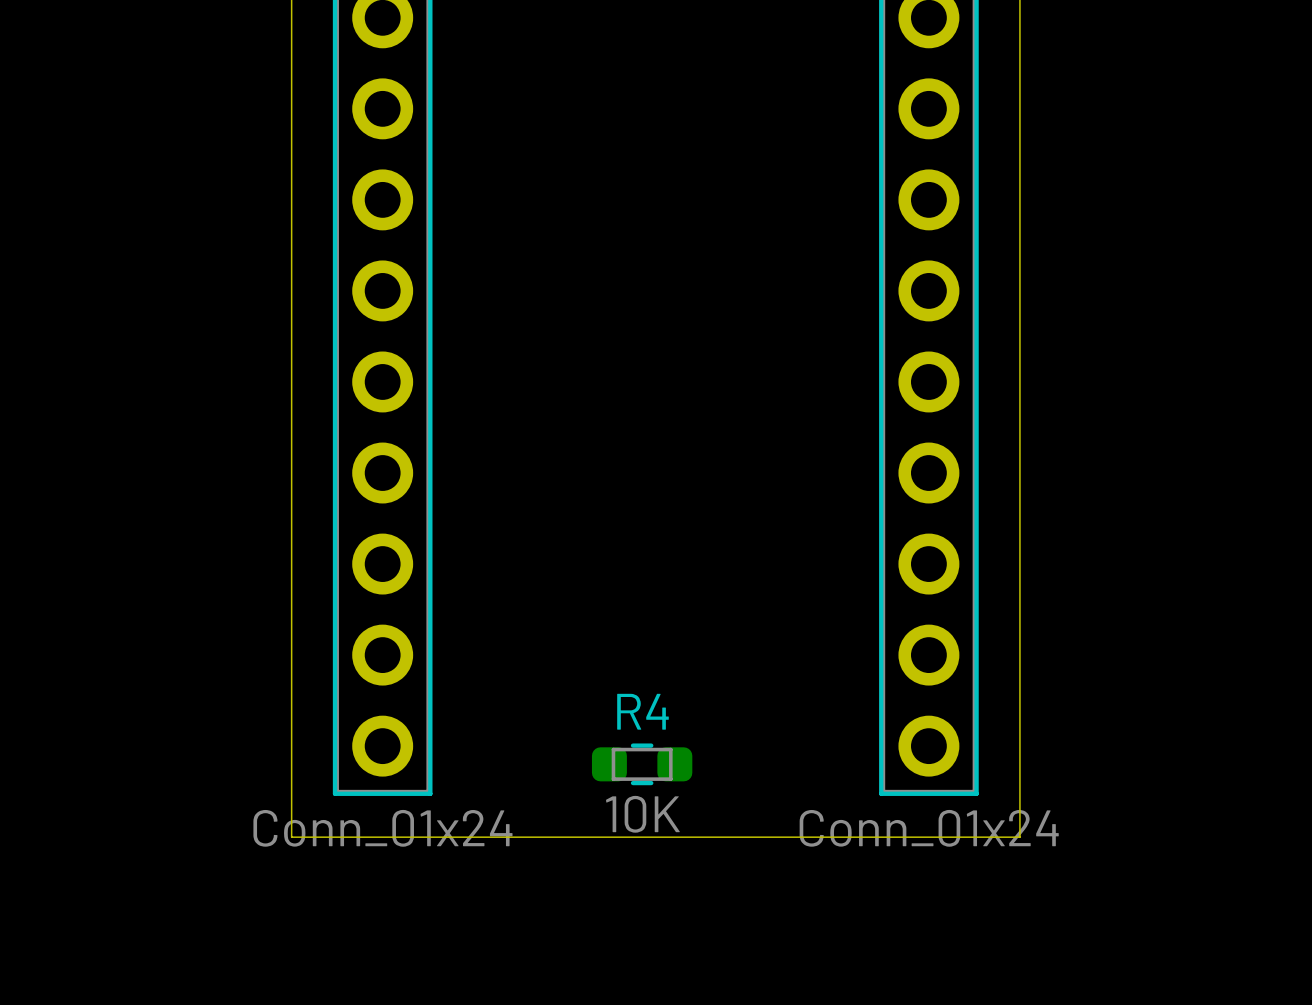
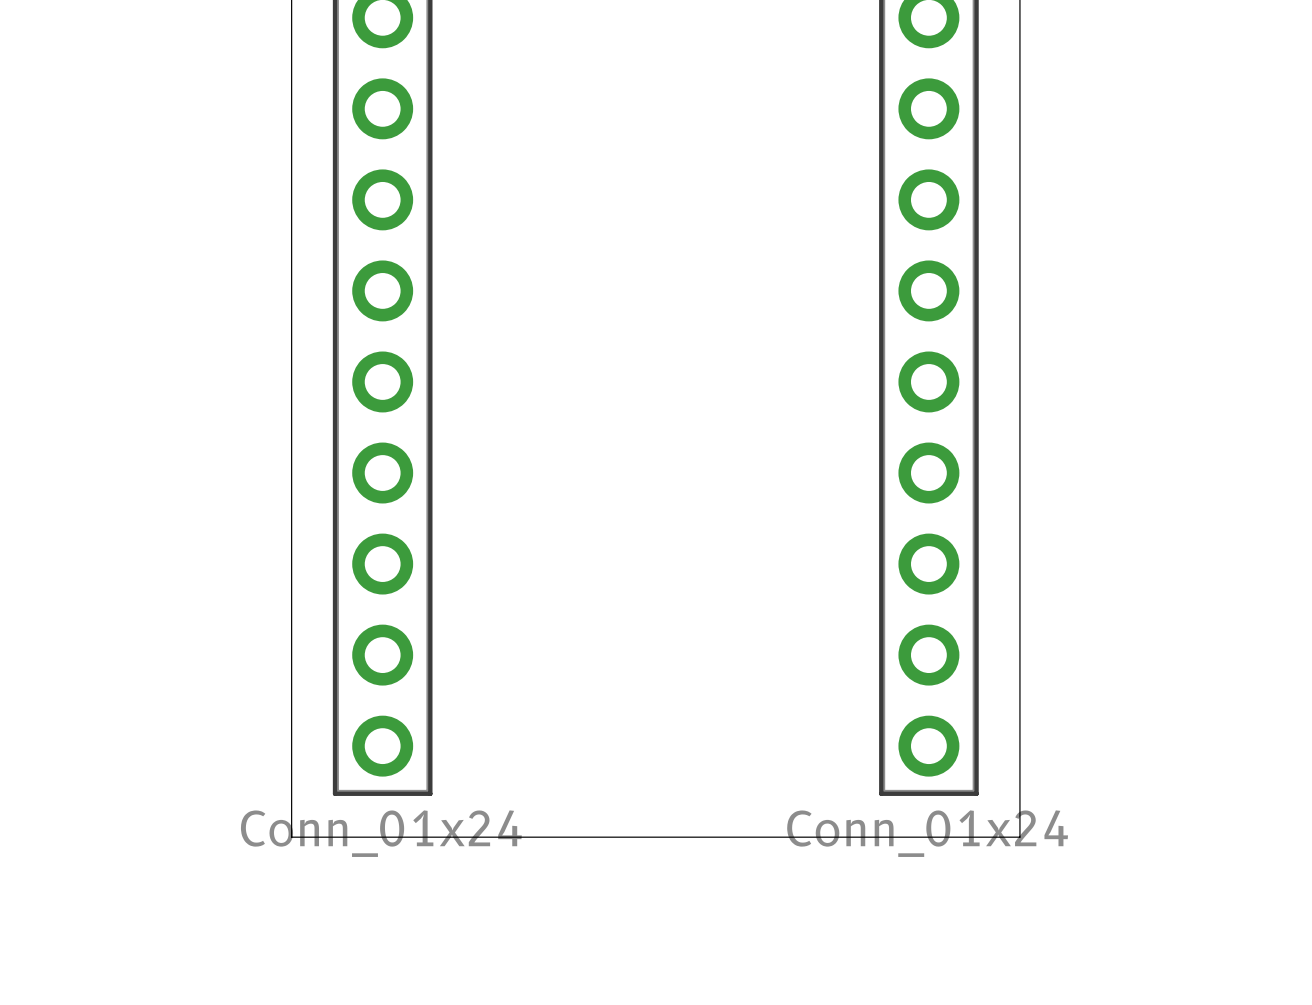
R4: 10K (642, 764) -> none

